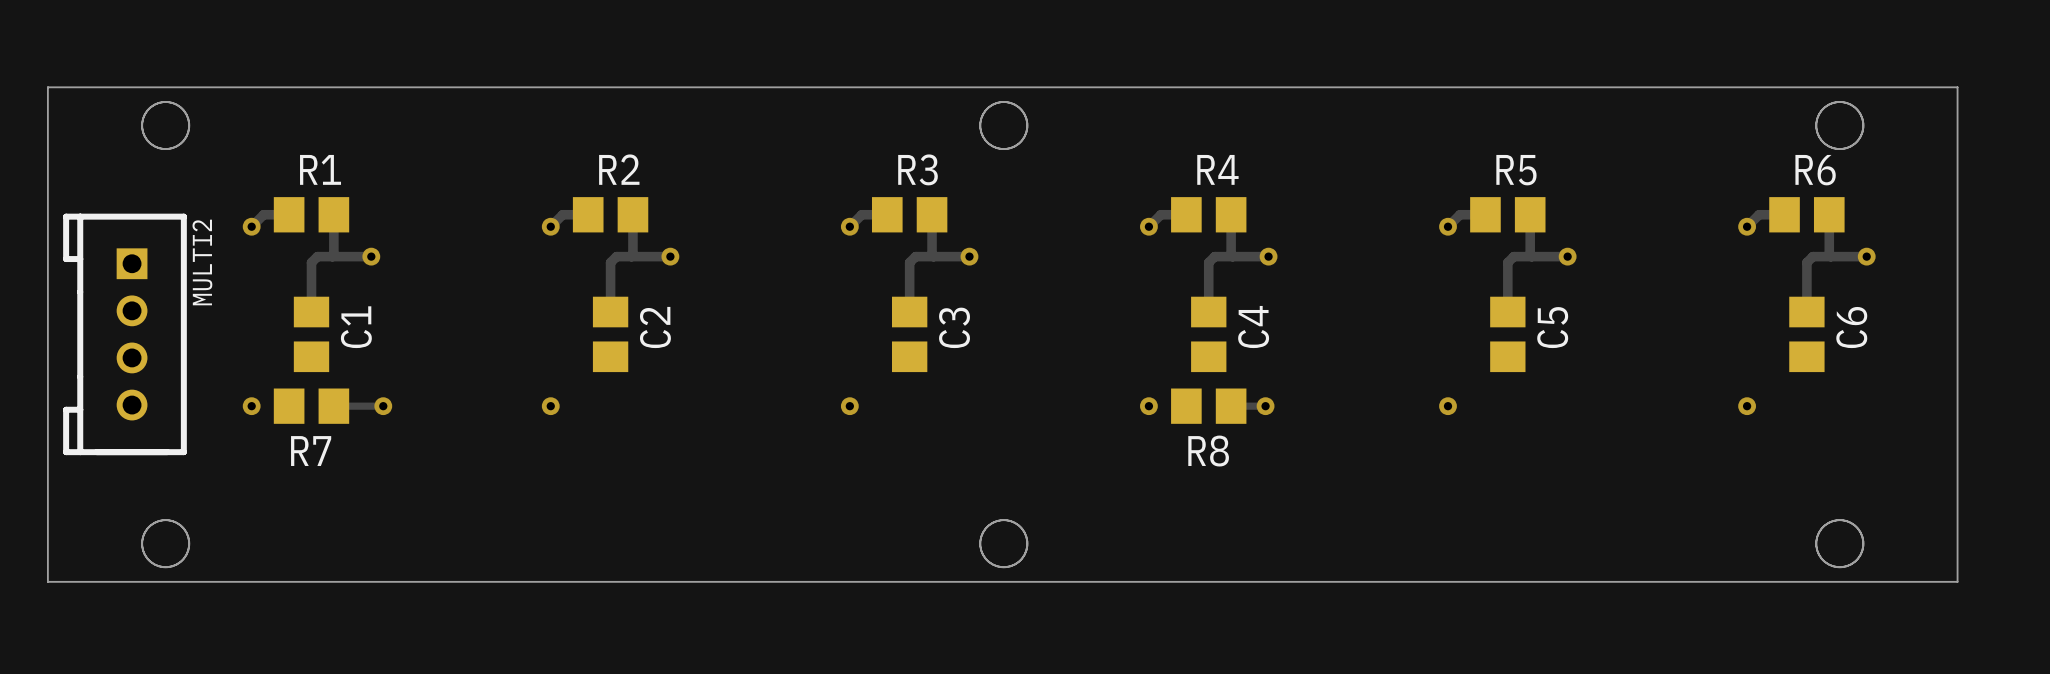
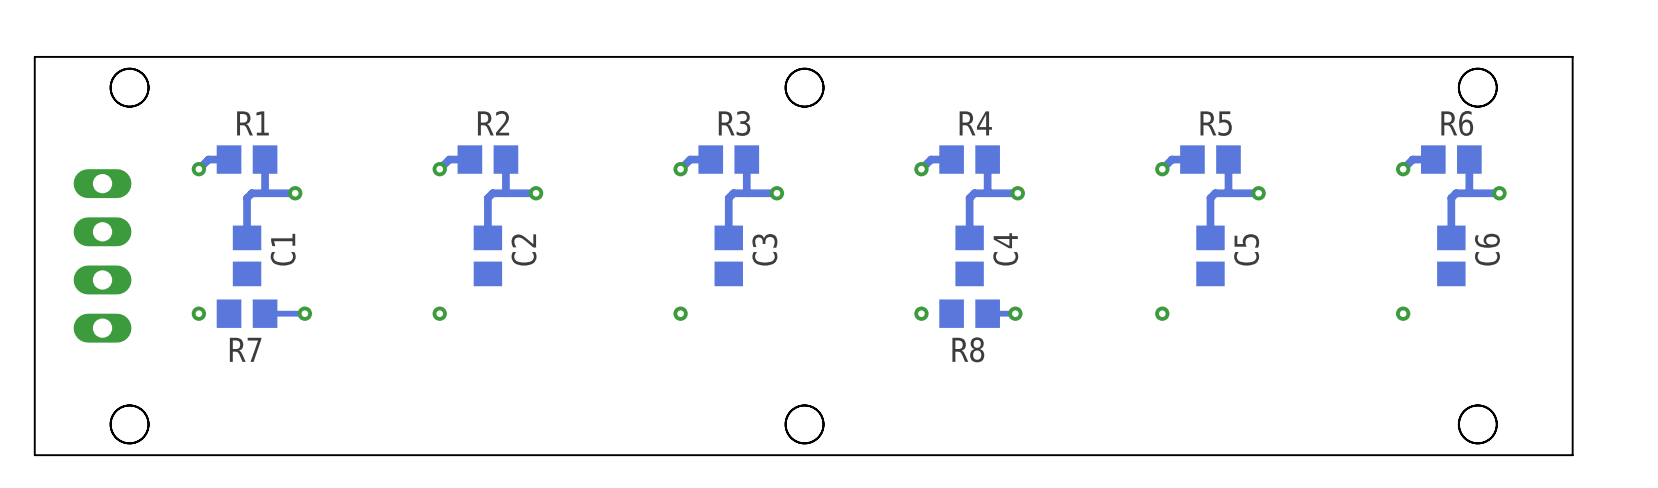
MULTI2: (124, 334) -> none
part: none -> (102, 255)

